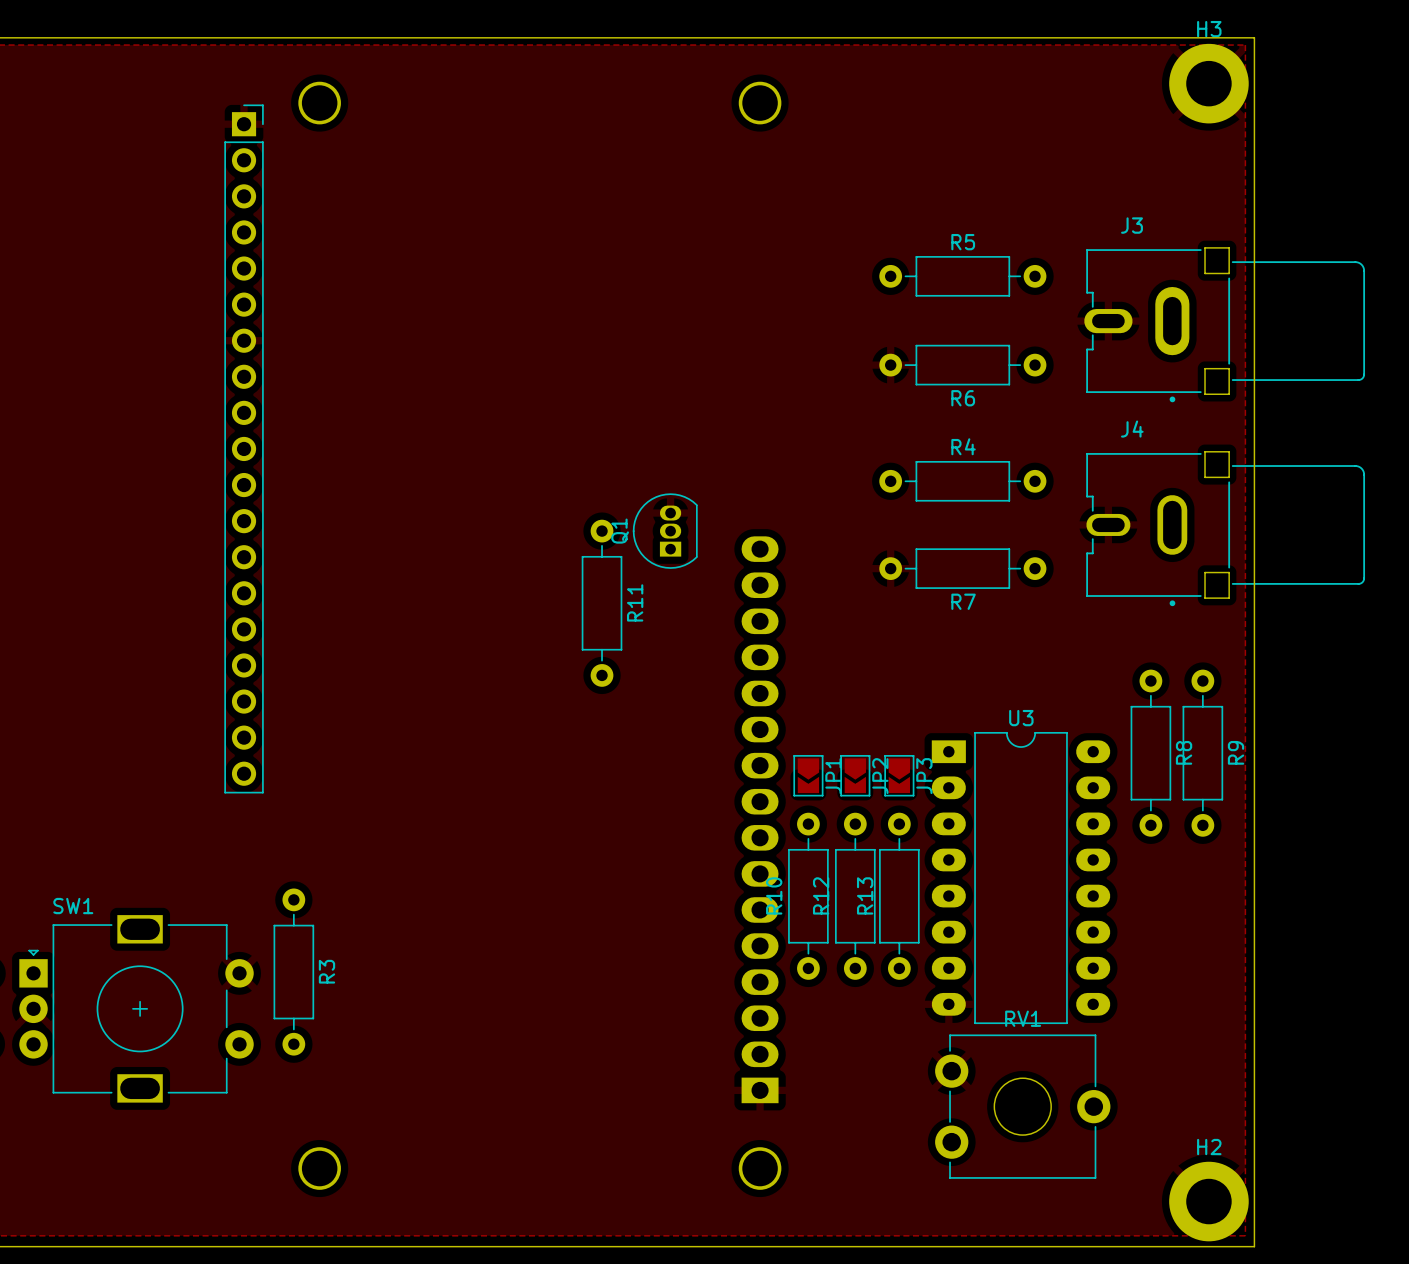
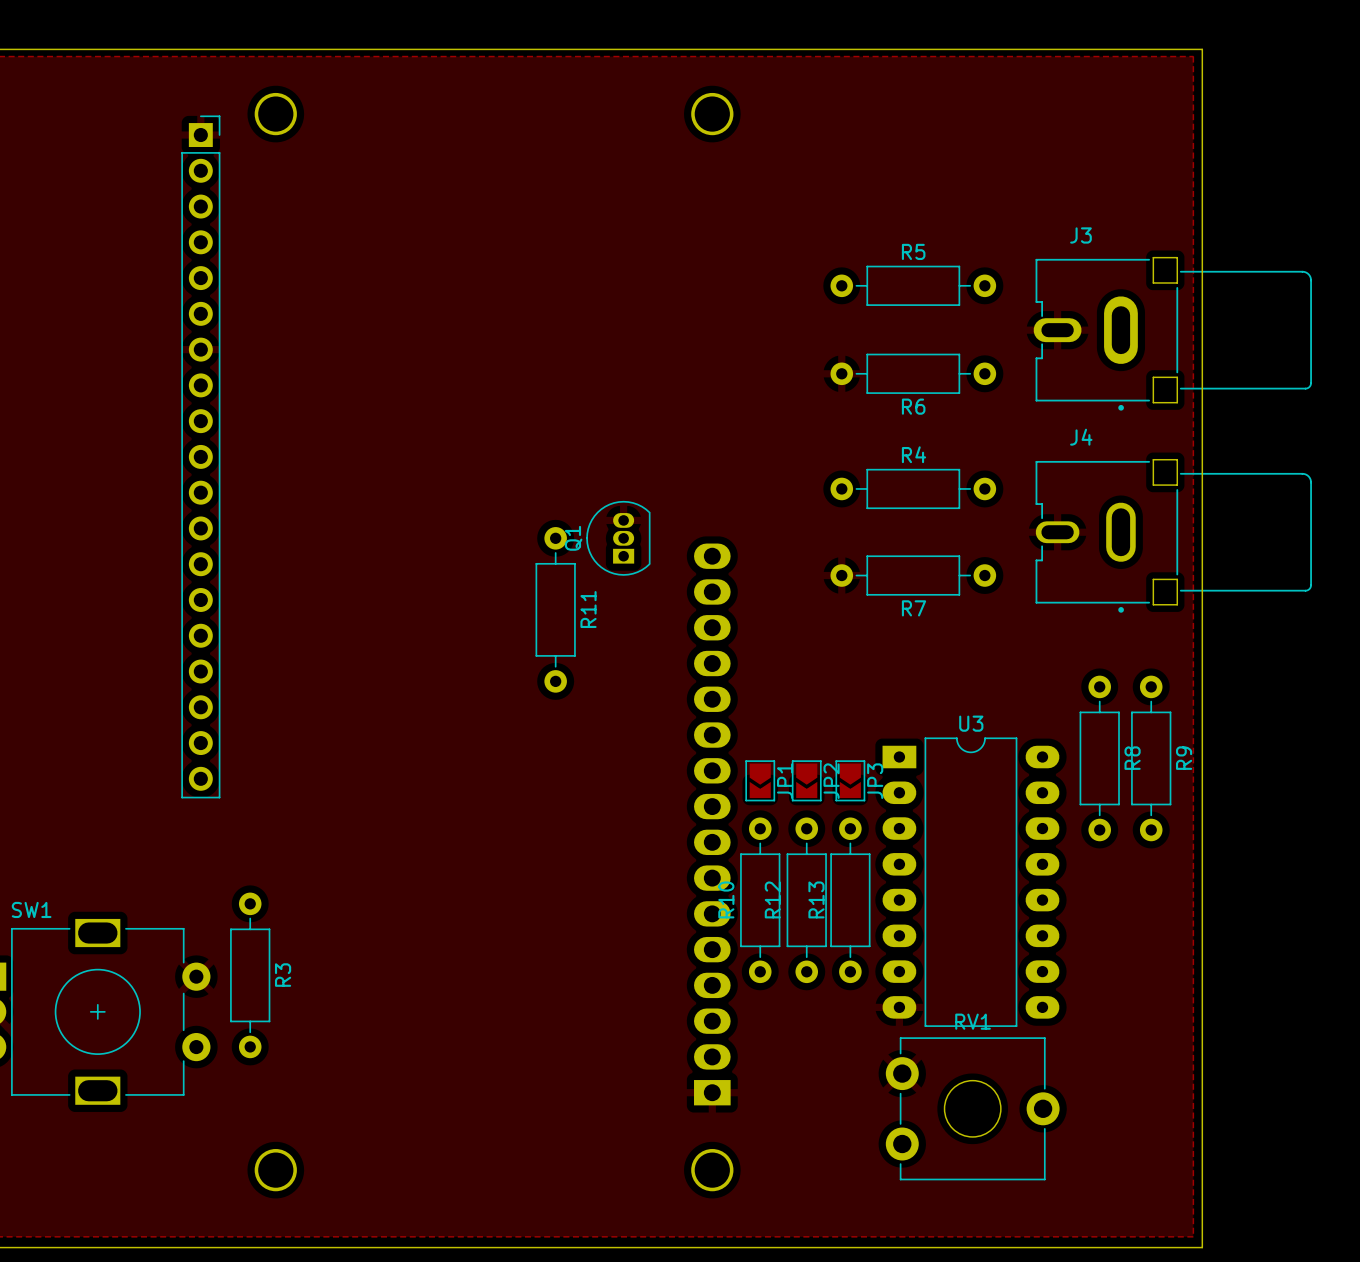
H3: (1208, 83) -> none
H2: (1208, 1201) -> none

